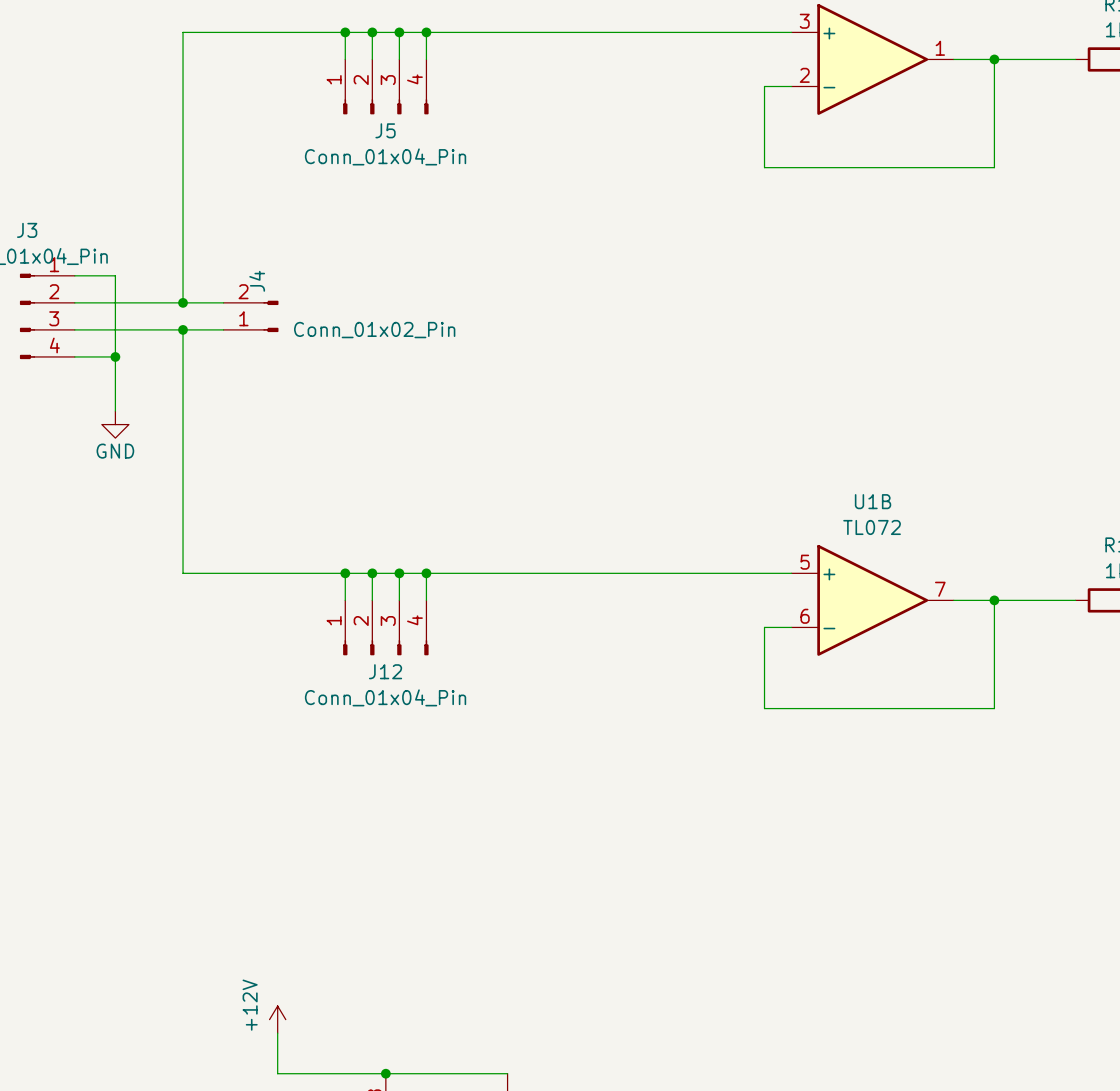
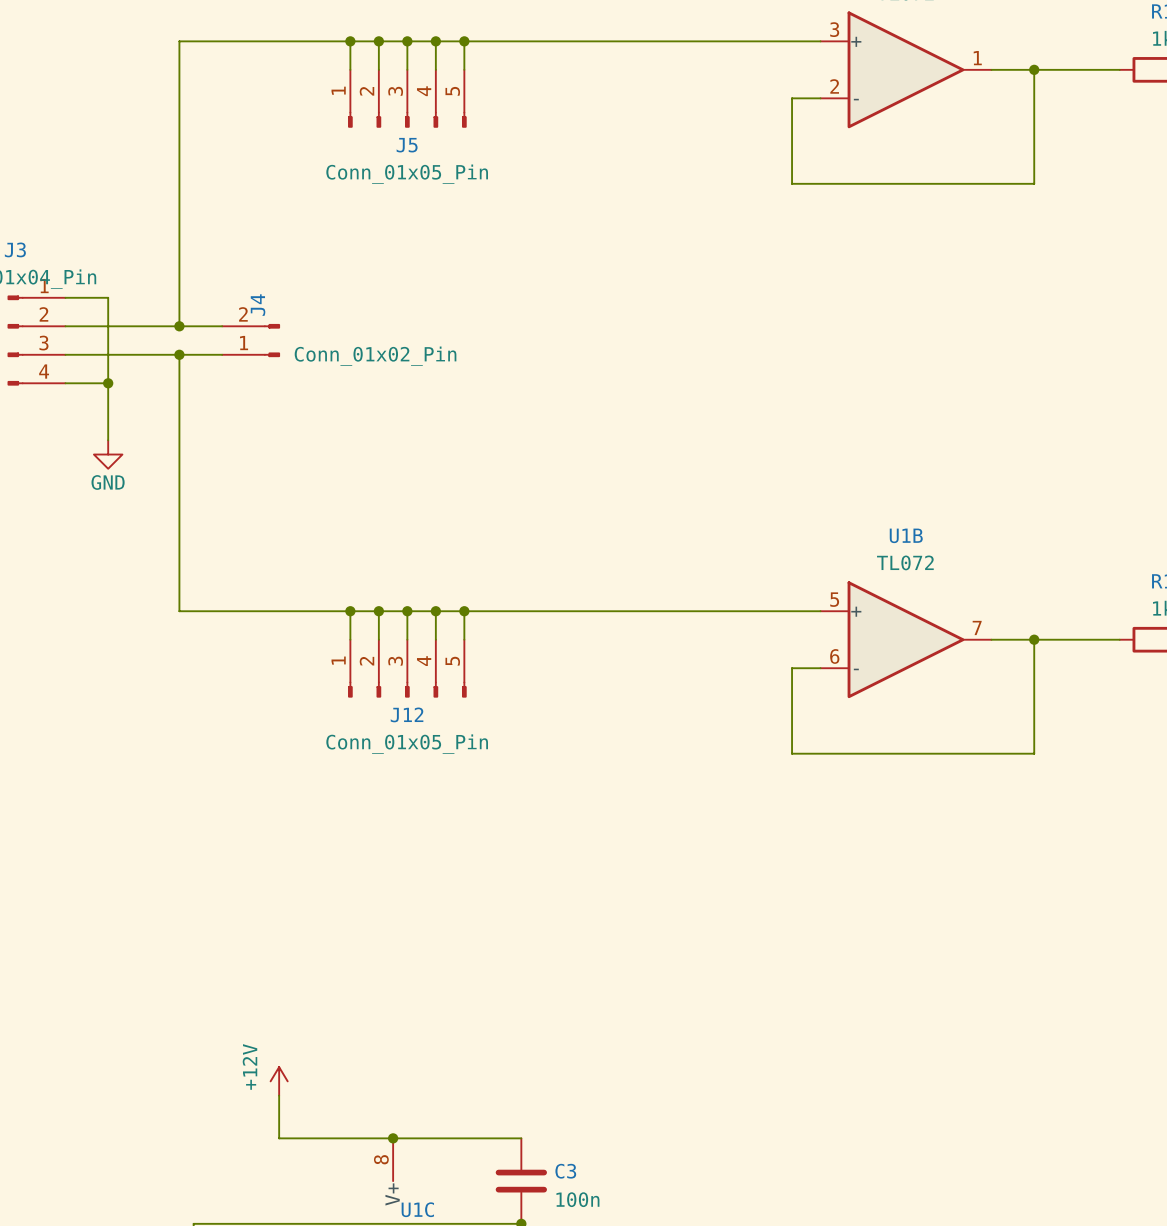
wire: none -> (464, 41) (464, 69)
junction: none -> (464, 41)
J5 symbol: [343, 59, 429, 115] -> [348, 69, 467, 128]
J5 value: Conn_01x04_Pin (385, 156) -> Conn_01x05_Pin (407, 174)
wire: none -> (464, 611) (464, 639)
junction: none -> (464, 611)
J12 symbol: [343, 600, 429, 656] -> [348, 639, 467, 698]
J12 value: Conn_01x04_Pin (385, 697) -> Conn_01x05_Pin (407, 744)

